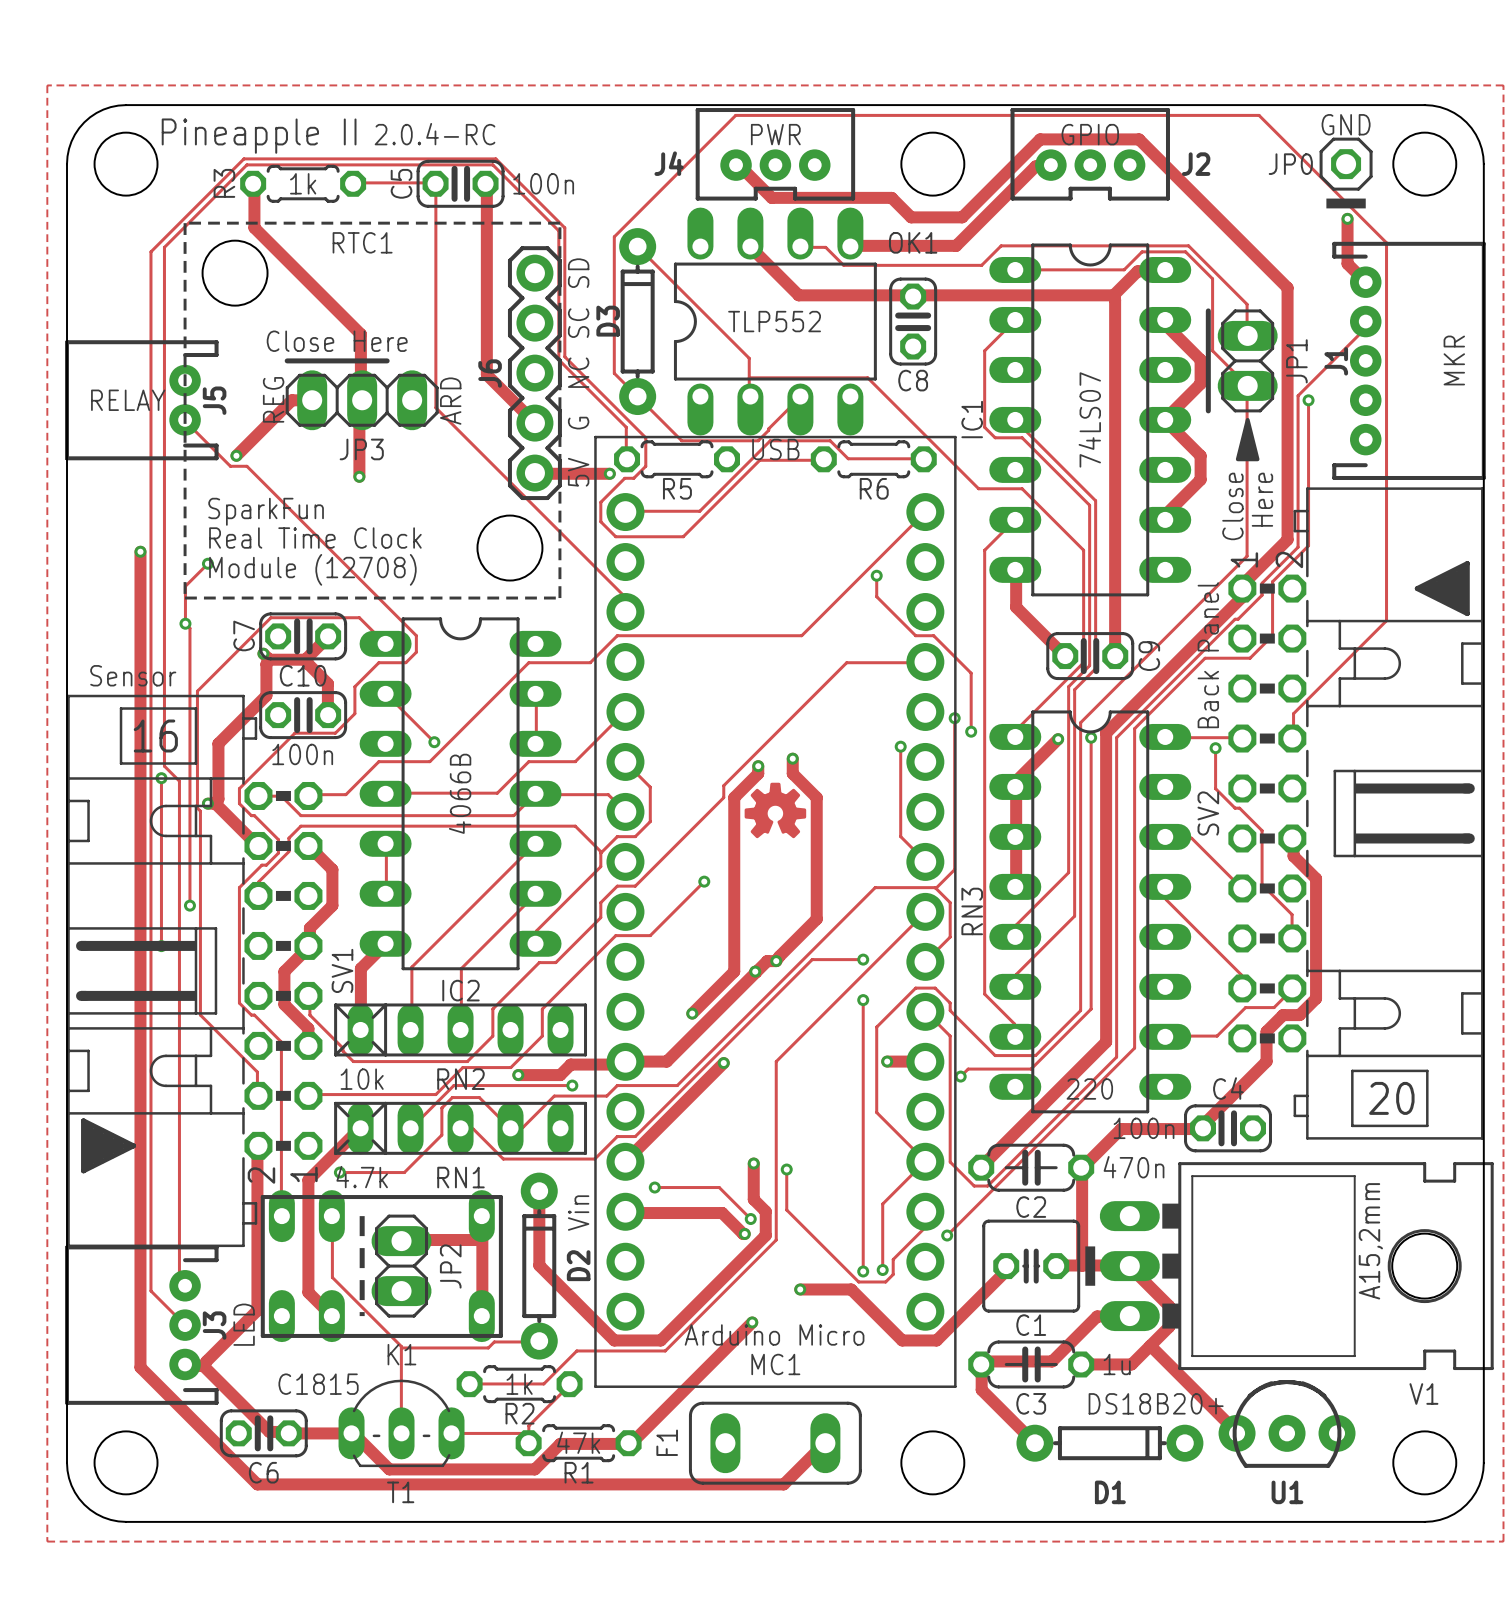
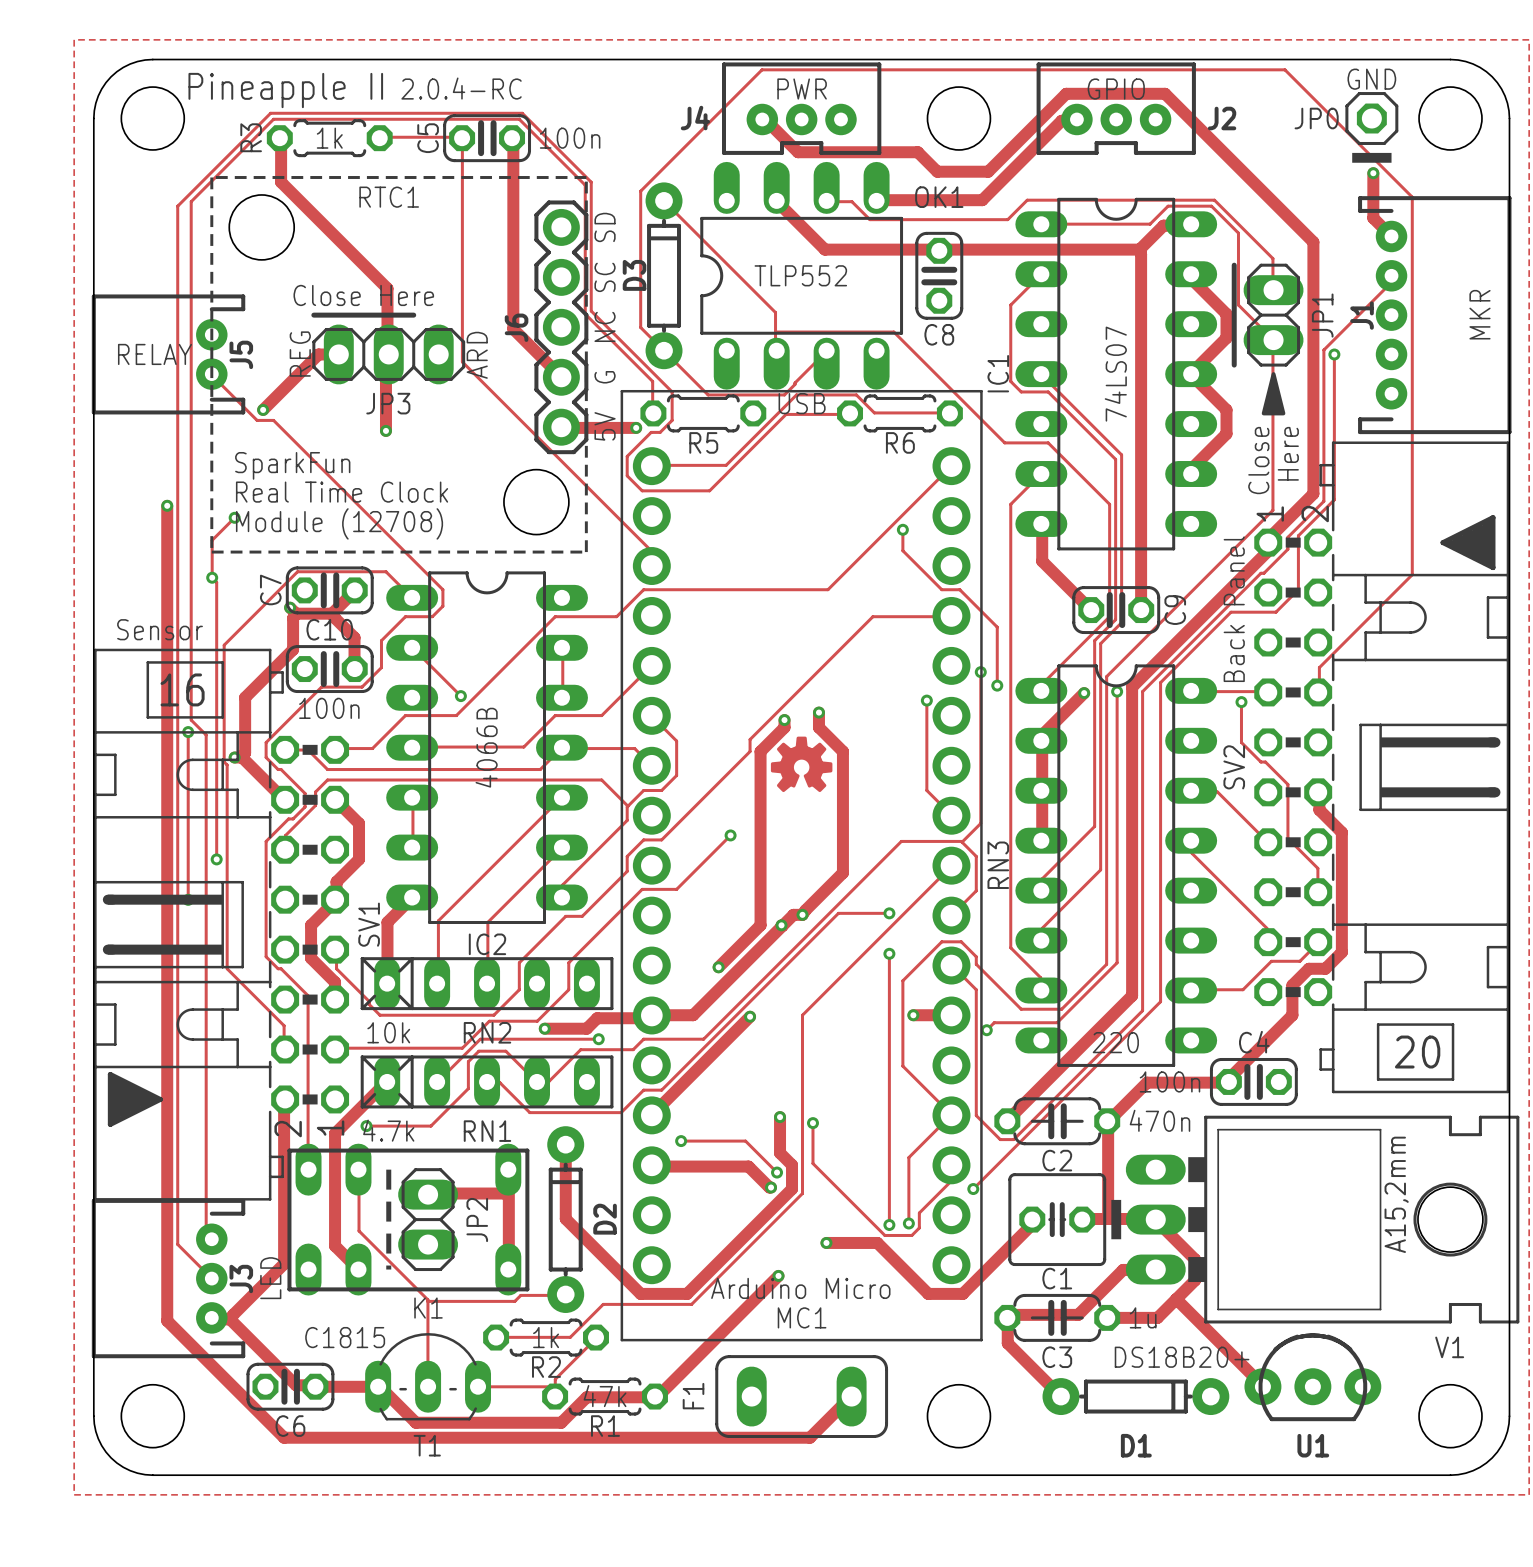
text: Vin (578, 1213) -> none

